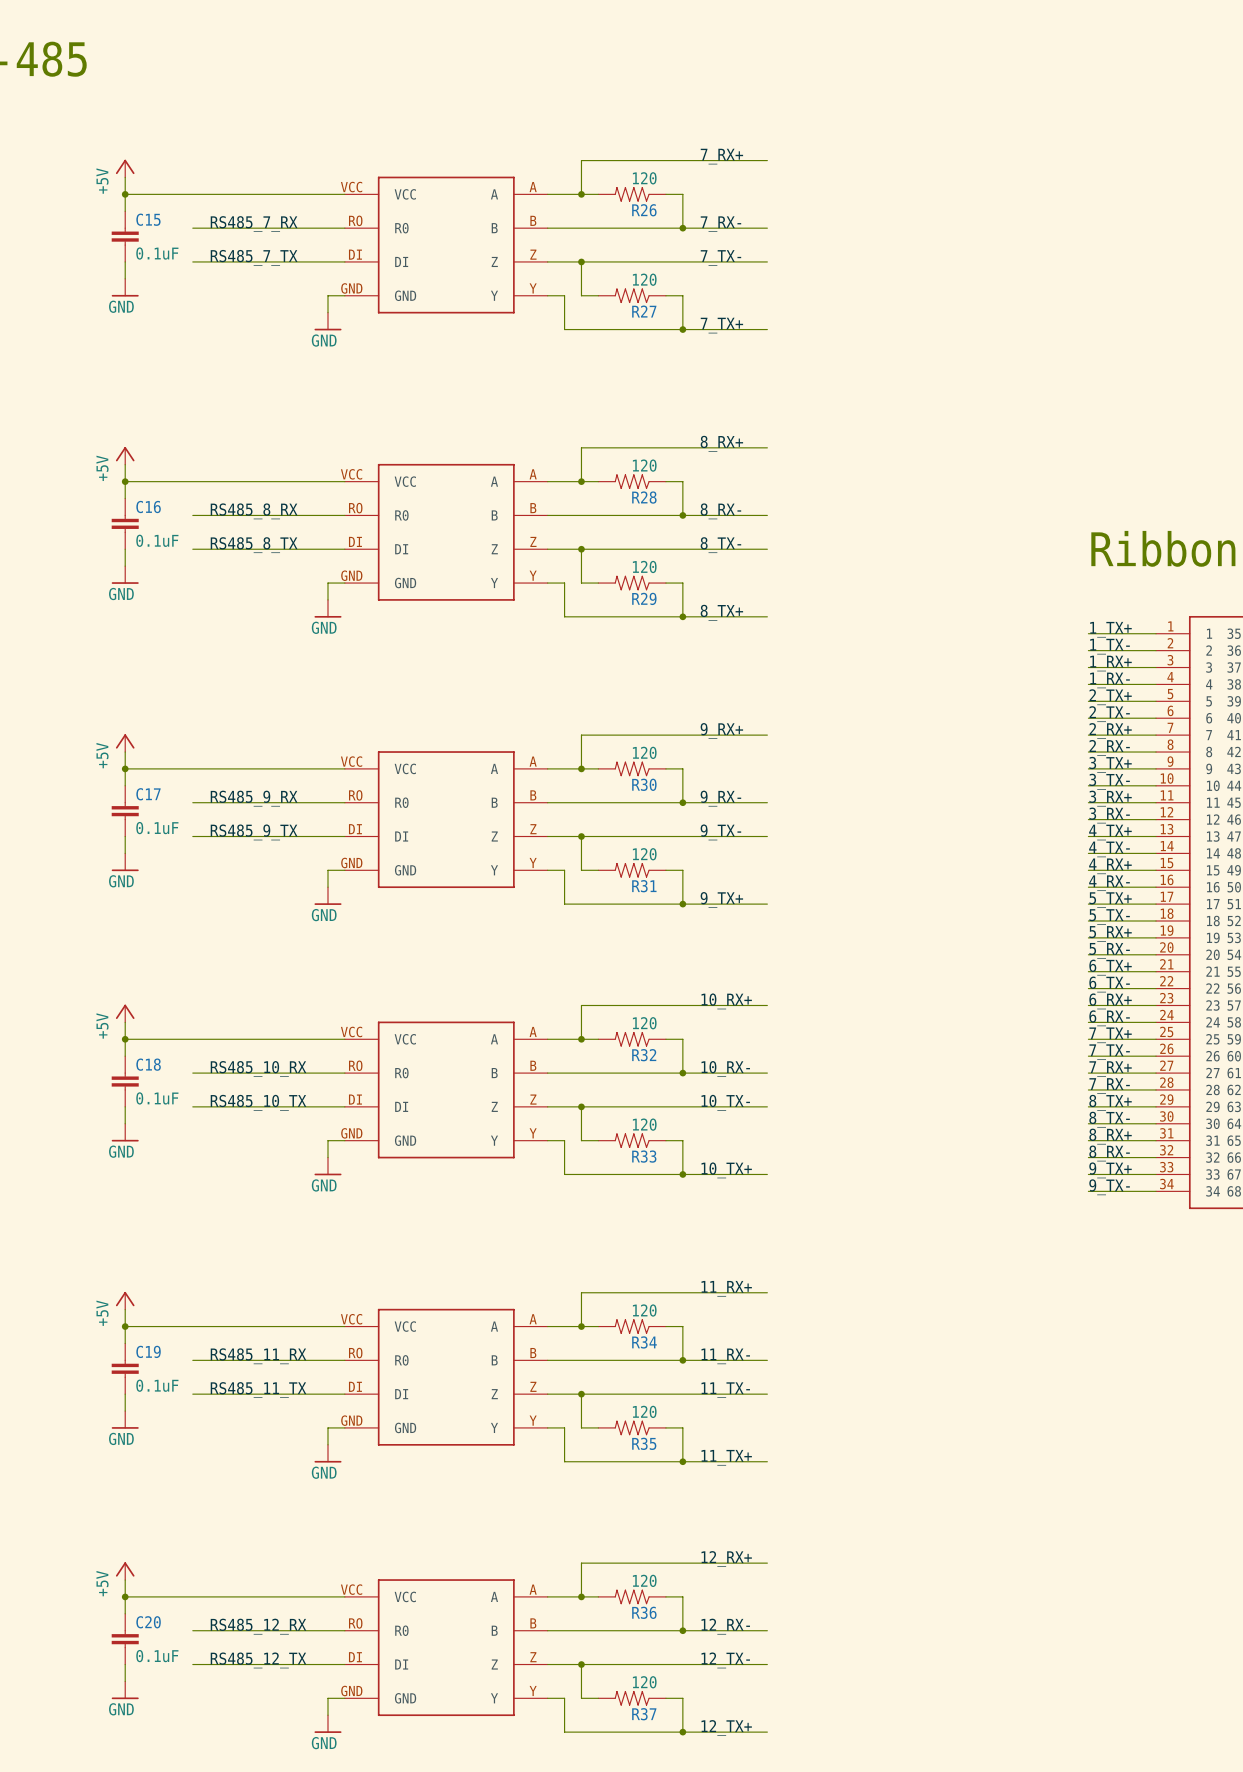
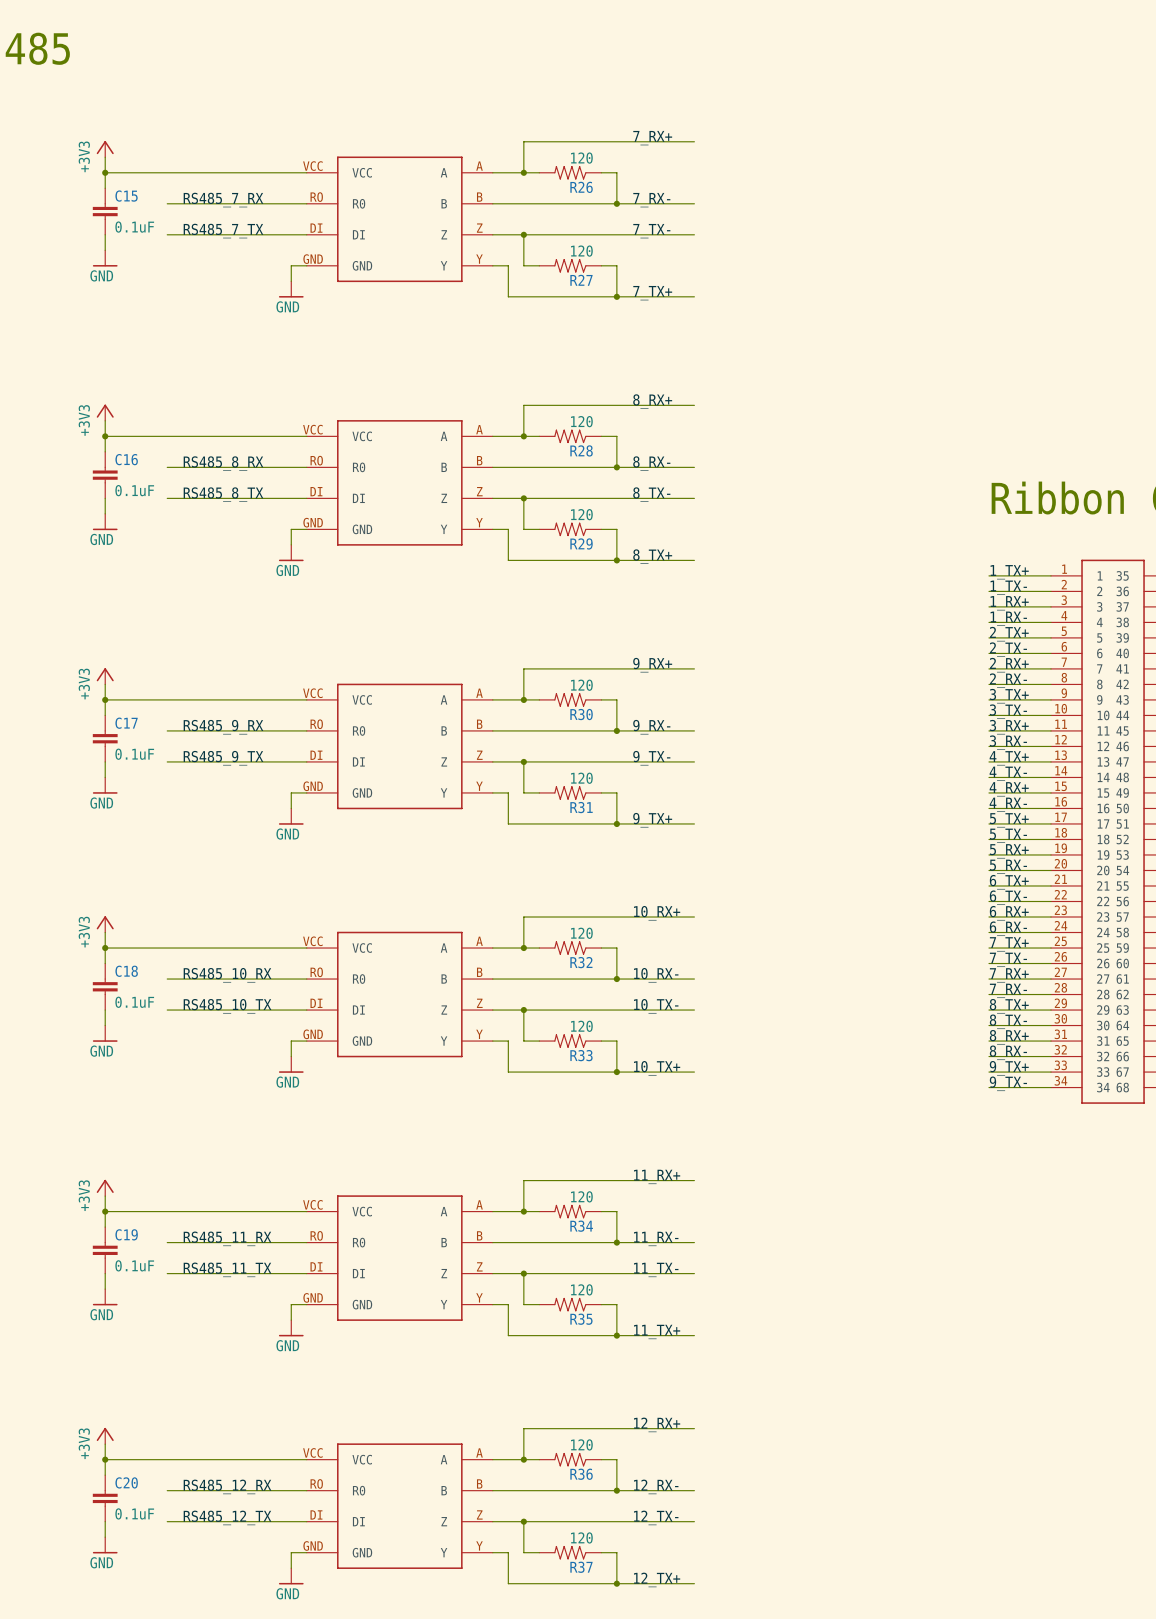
power symbol: +5V (125, 168) -> +3V3 (105, 149)
power symbol: +5V (125, 455) -> +3V3 (105, 412)
power symbol: +5V (125, 743) -> +3V3 (105, 676)
power symbol: +5V (125, 1013) -> +3V3 (105, 924)
power symbol: +5V (125, 1300) -> +3V3 (105, 1187)
power symbol: +5V (125, 1571) -> +3V3 (105, 1436)

